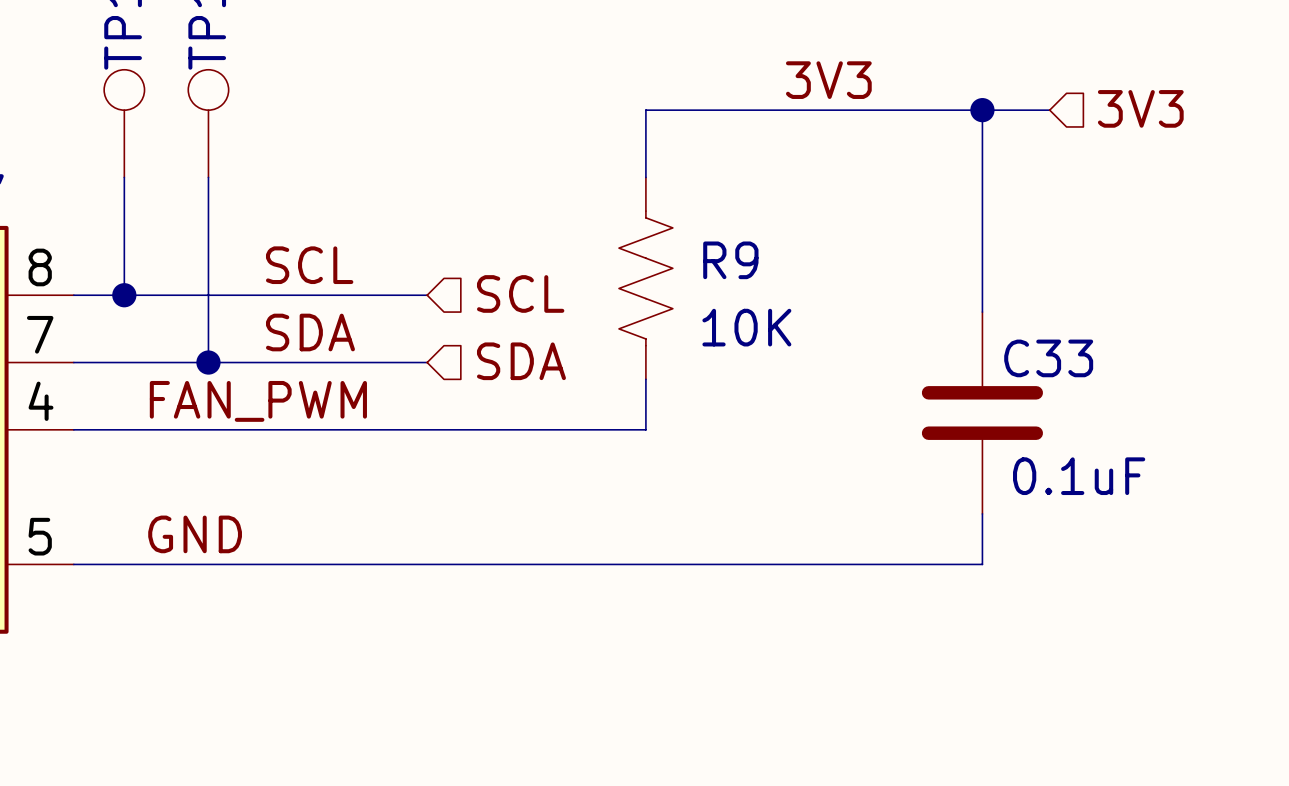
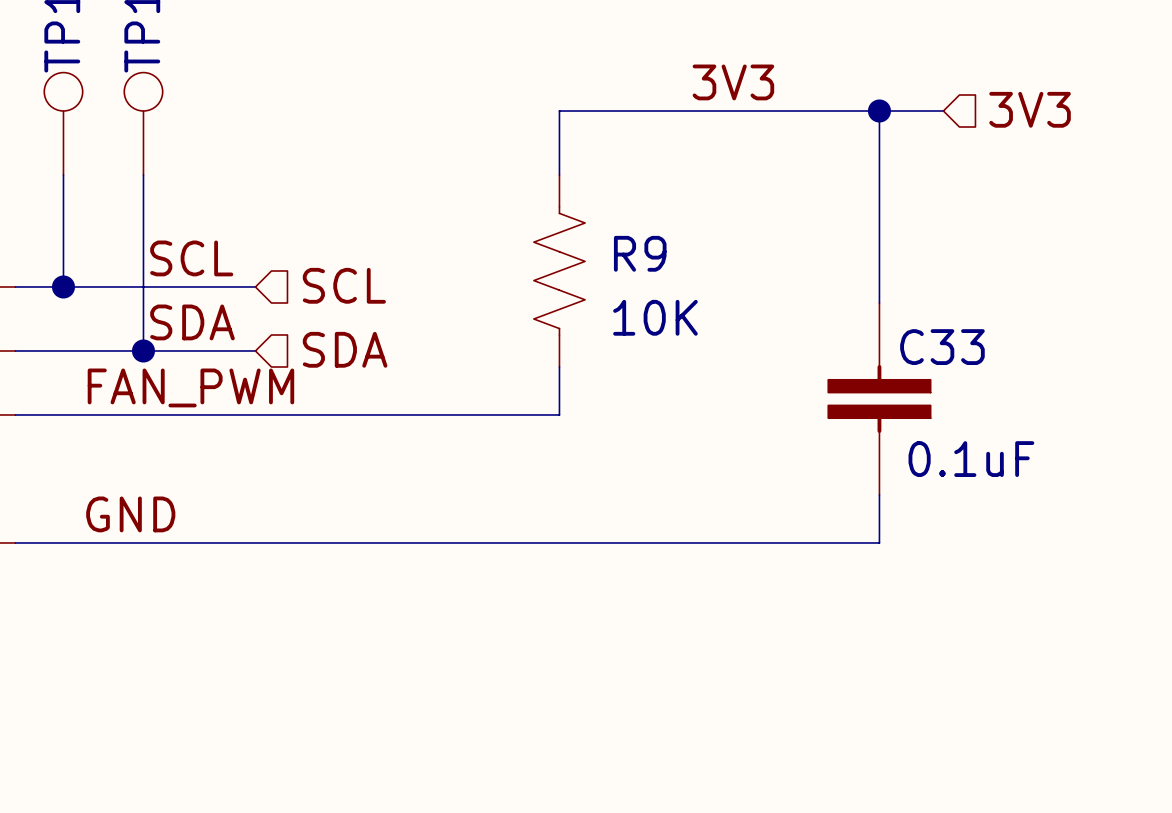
label position: SCL (309, 265) -> SCL (191, 258)
hierarchical label position: SCL (520, 293) -> SCL (344, 285)
wire: (326, 295) (427, 295) -> none
C33 symbol: [921, 312, 1044, 514] -> [828, 302, 931, 495]
label position: SDA (310, 332) -> SDA (192, 322)
hierarchical label position: SDA (521, 361) -> SDA (345, 349)
wire: (326, 362) (427, 362) -> none

